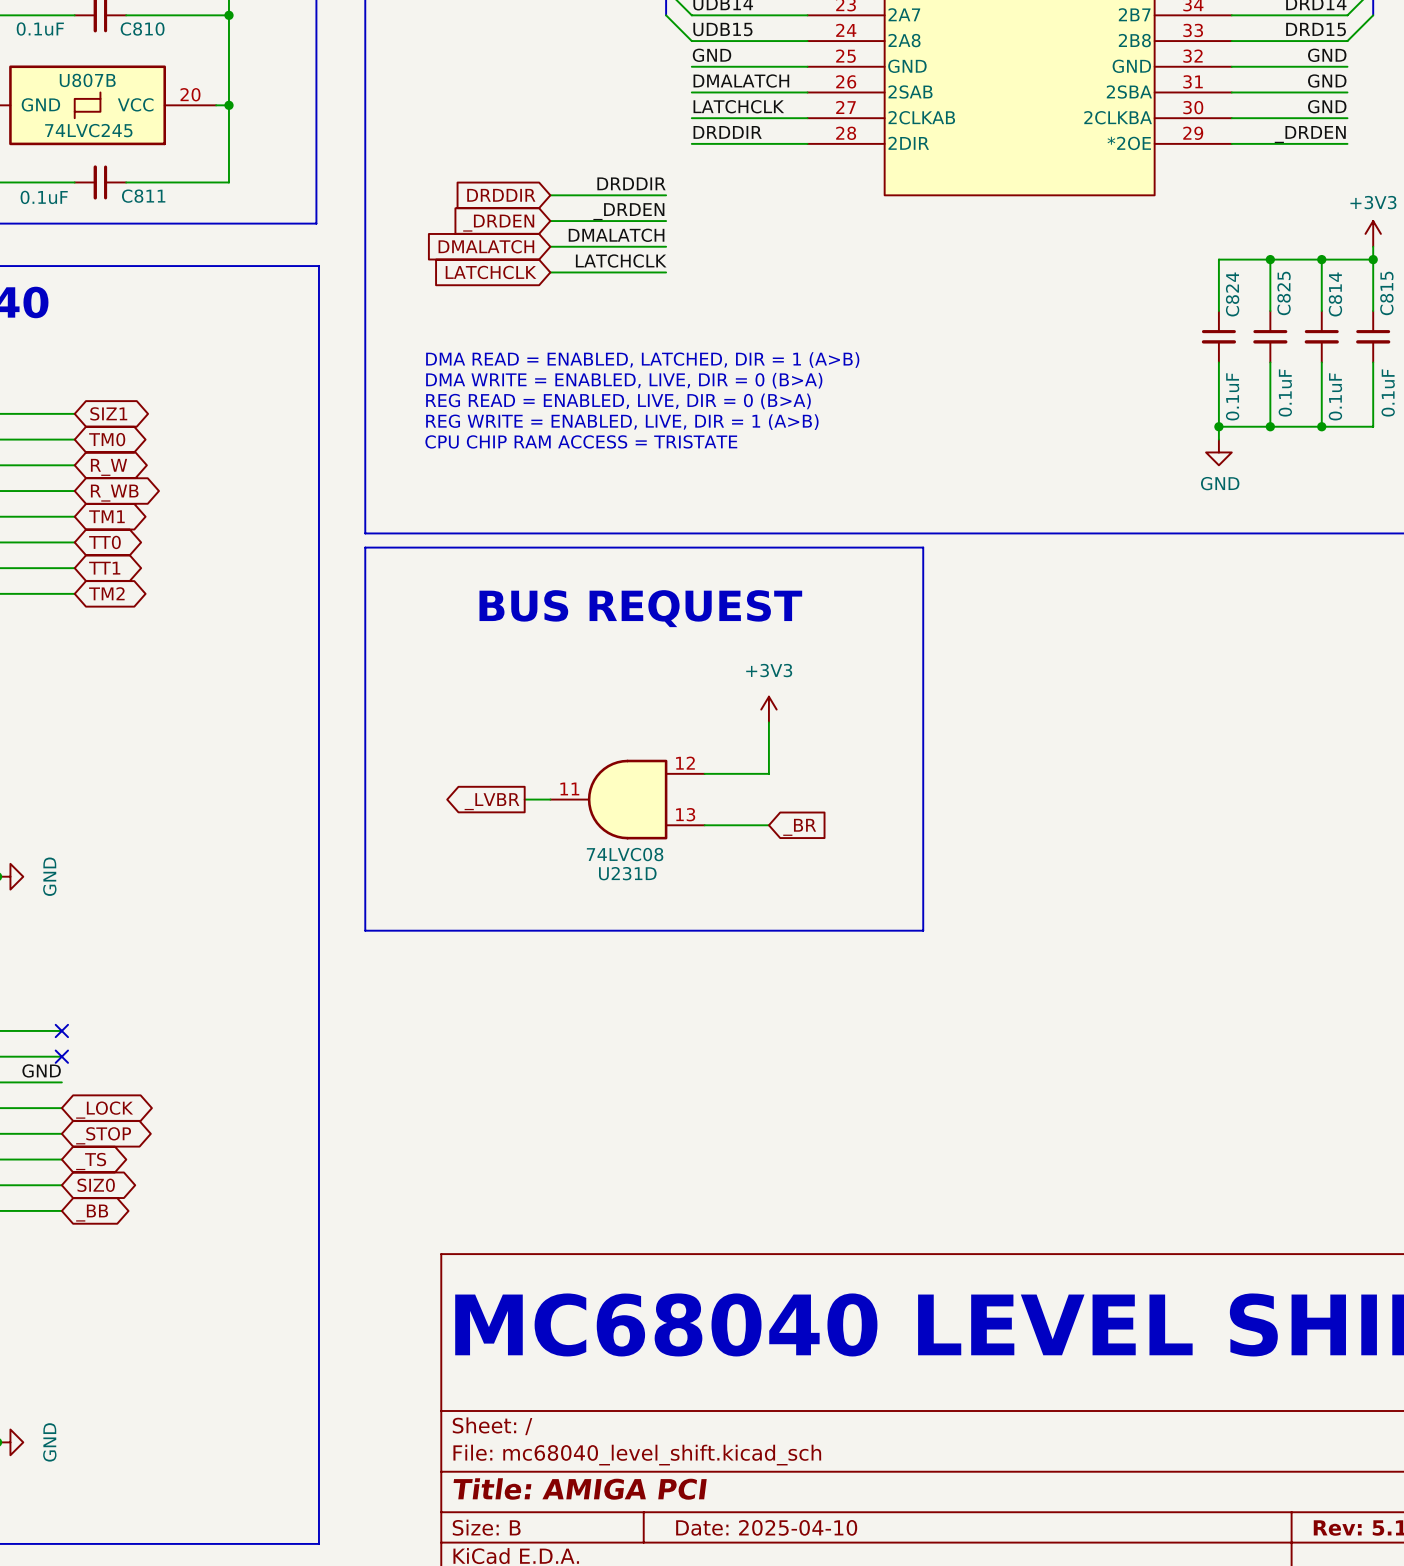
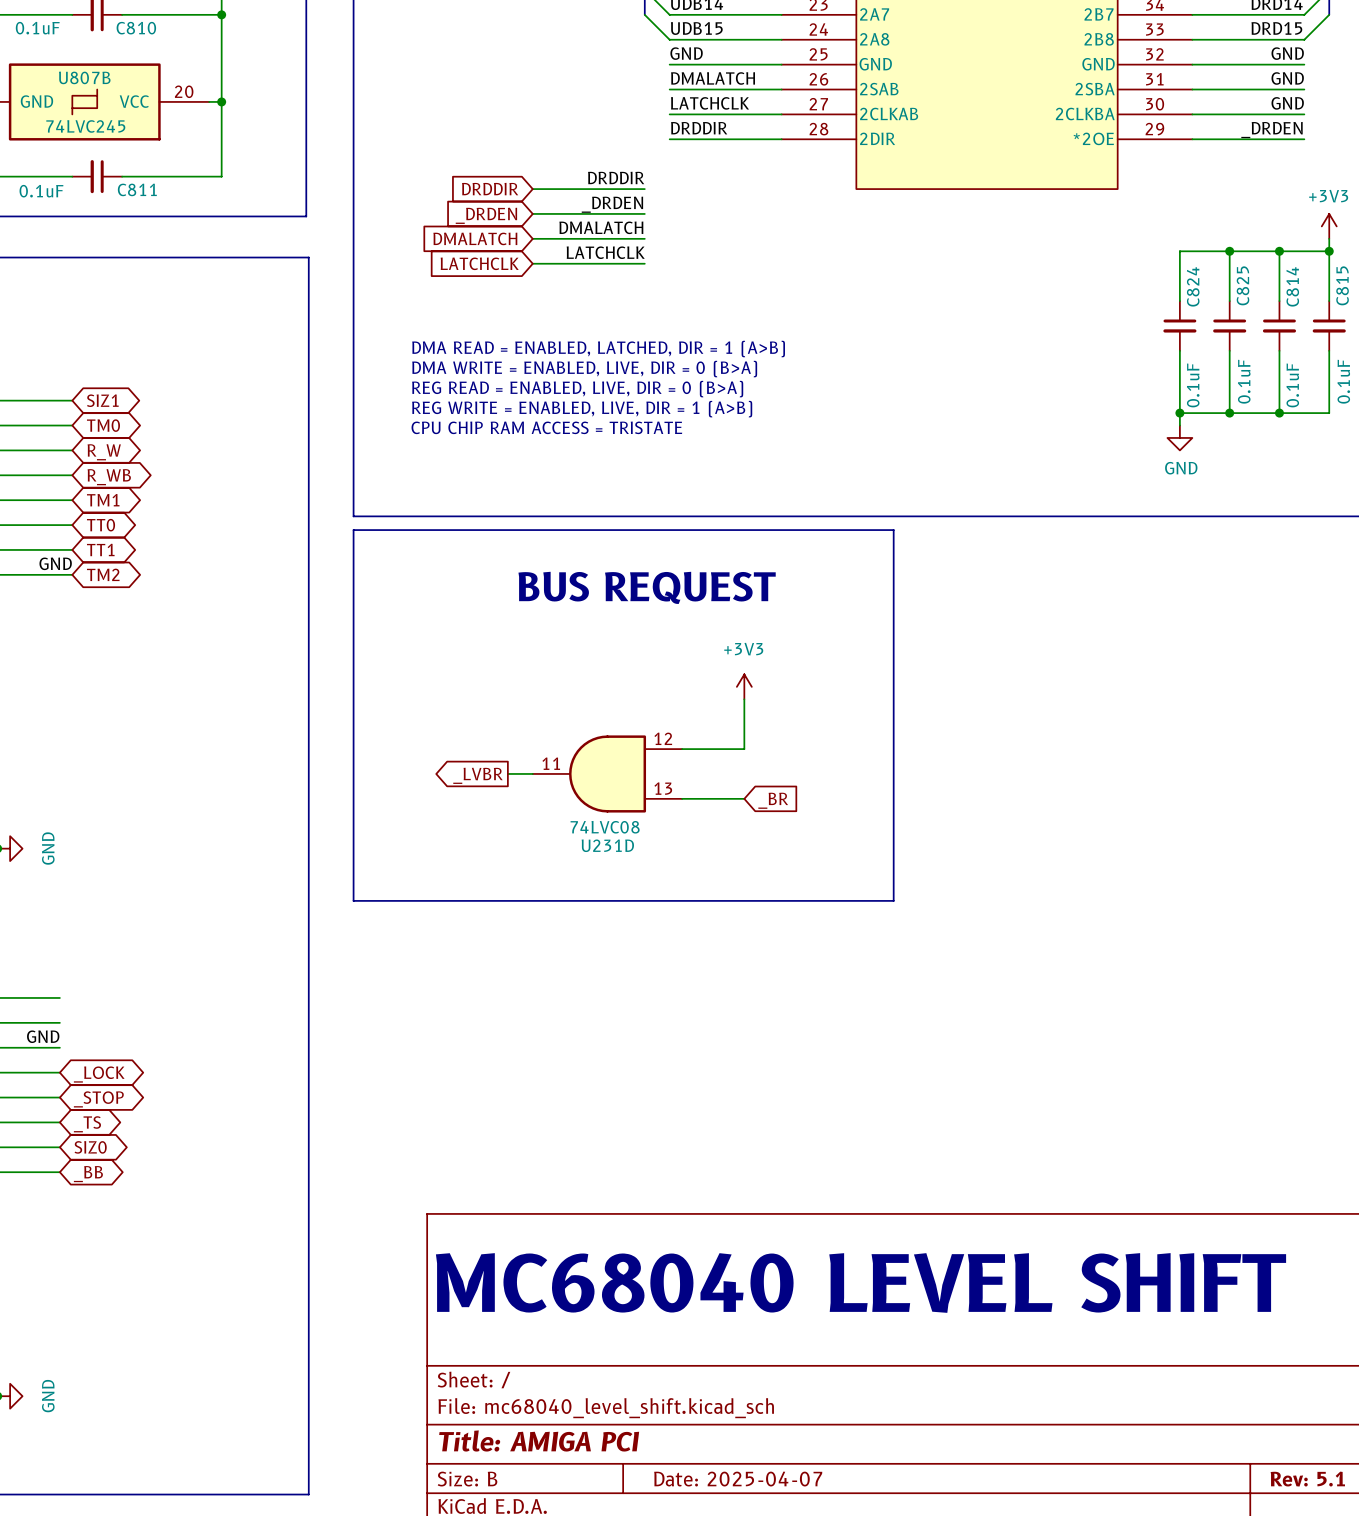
label: none -> GND (55, 563)
no-connect mark: (61, 1030) -> none
no-connect mark: (61, 1056) -> none
title block: Date: 2025-04-10 (766, 1527) -> Date: 2025-04-07 (738, 1479)

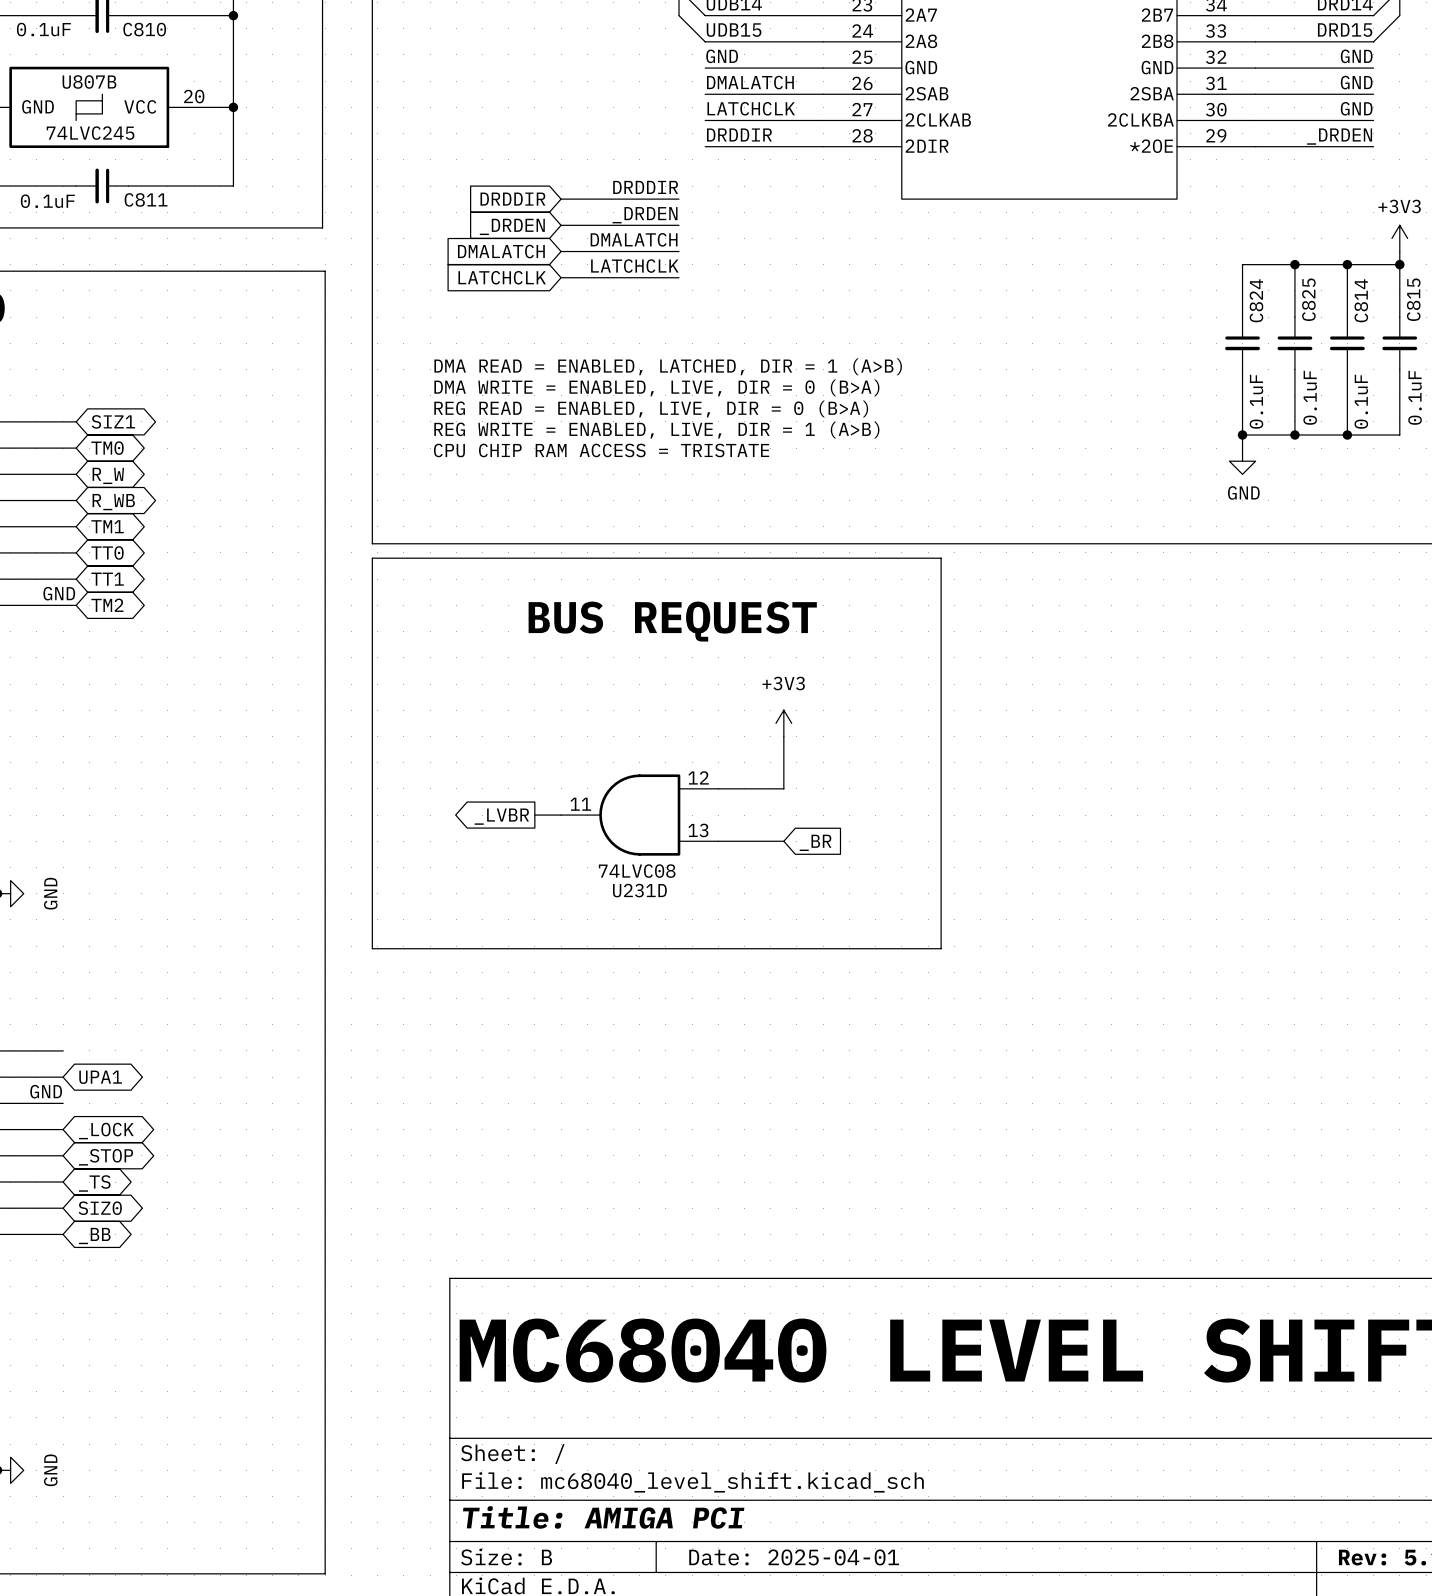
global label: none -> UPA1 (100, 1077)
title block: Date: 2025-04-07 (738, 1479) -> Date: 2025-04-01 (794, 1557)

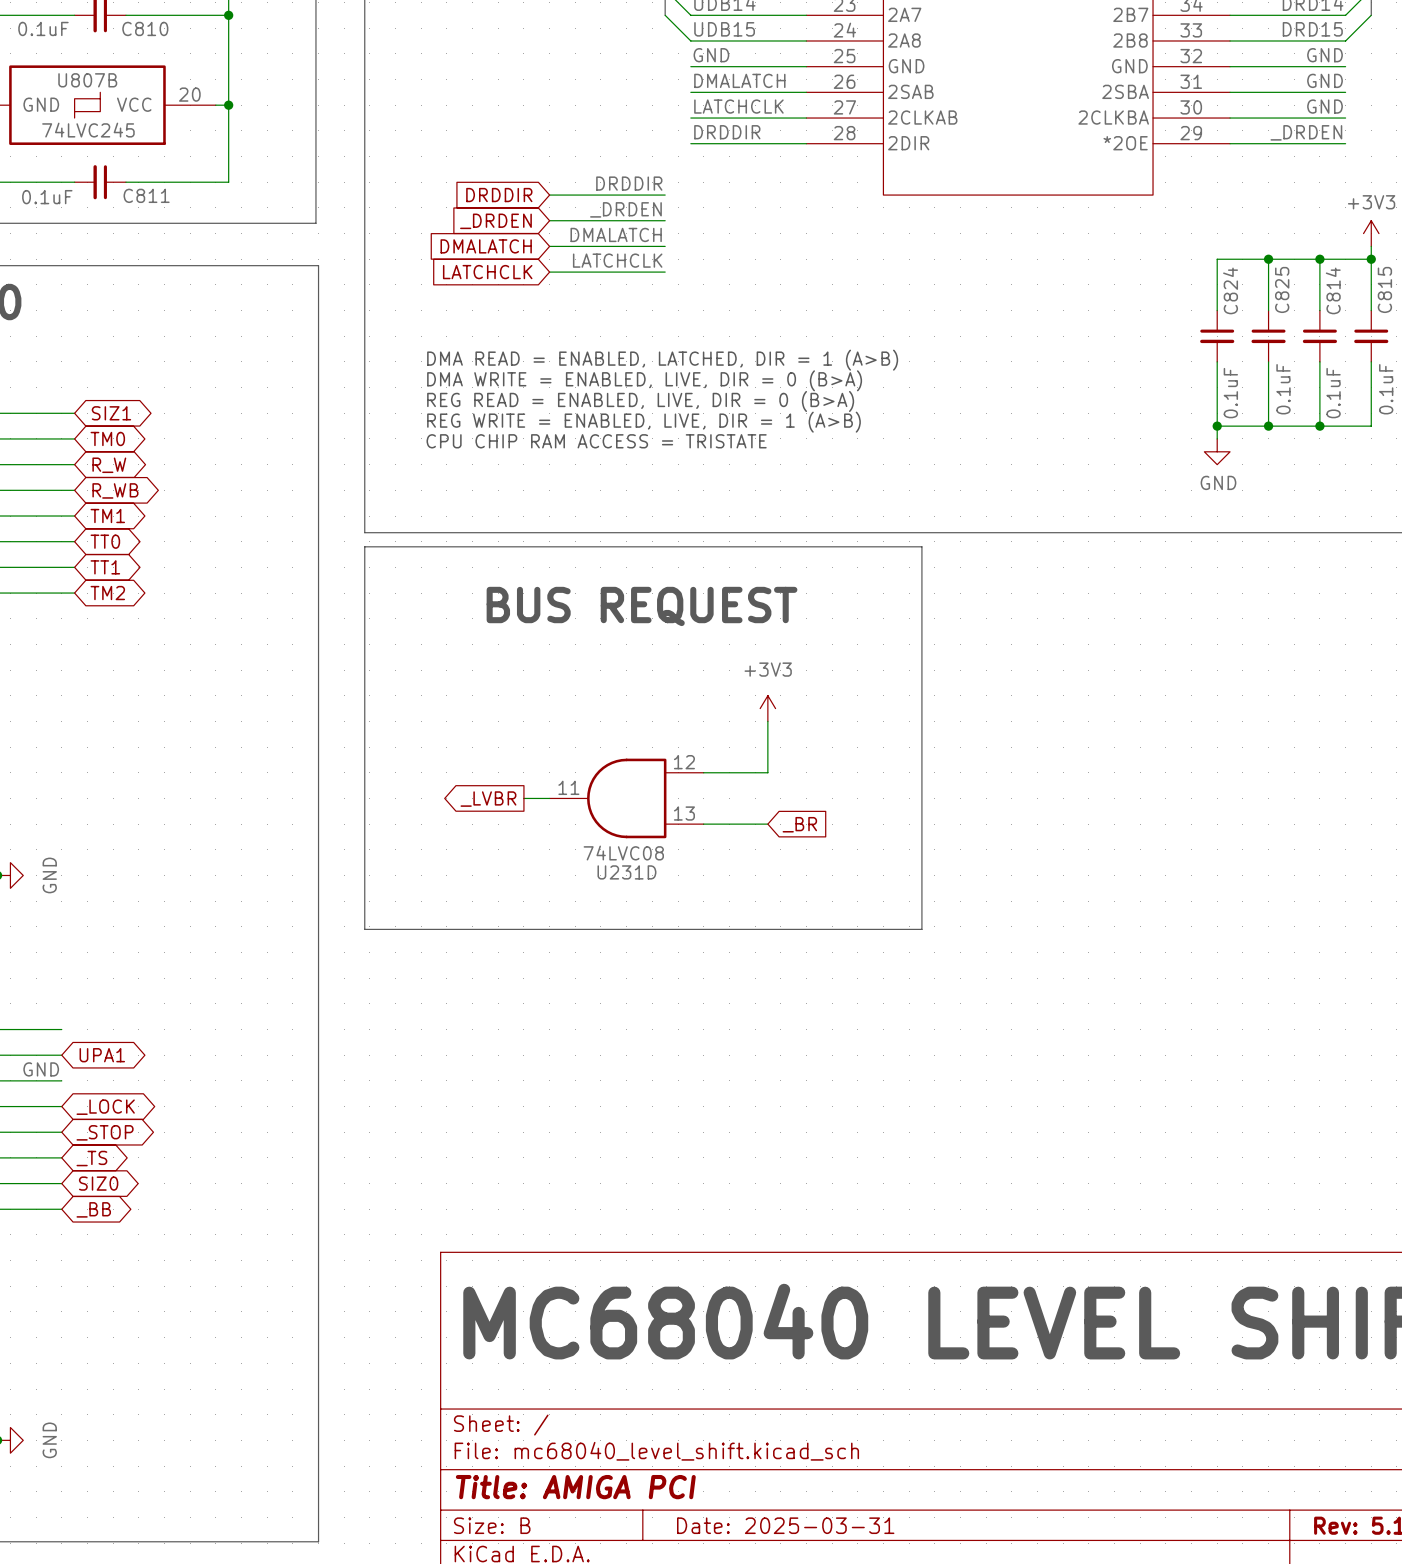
label: GND (59, 593) -> none
title block: Date: 2025-04-01 (794, 1557) -> Date: 2025-03-31 (785, 1525)

